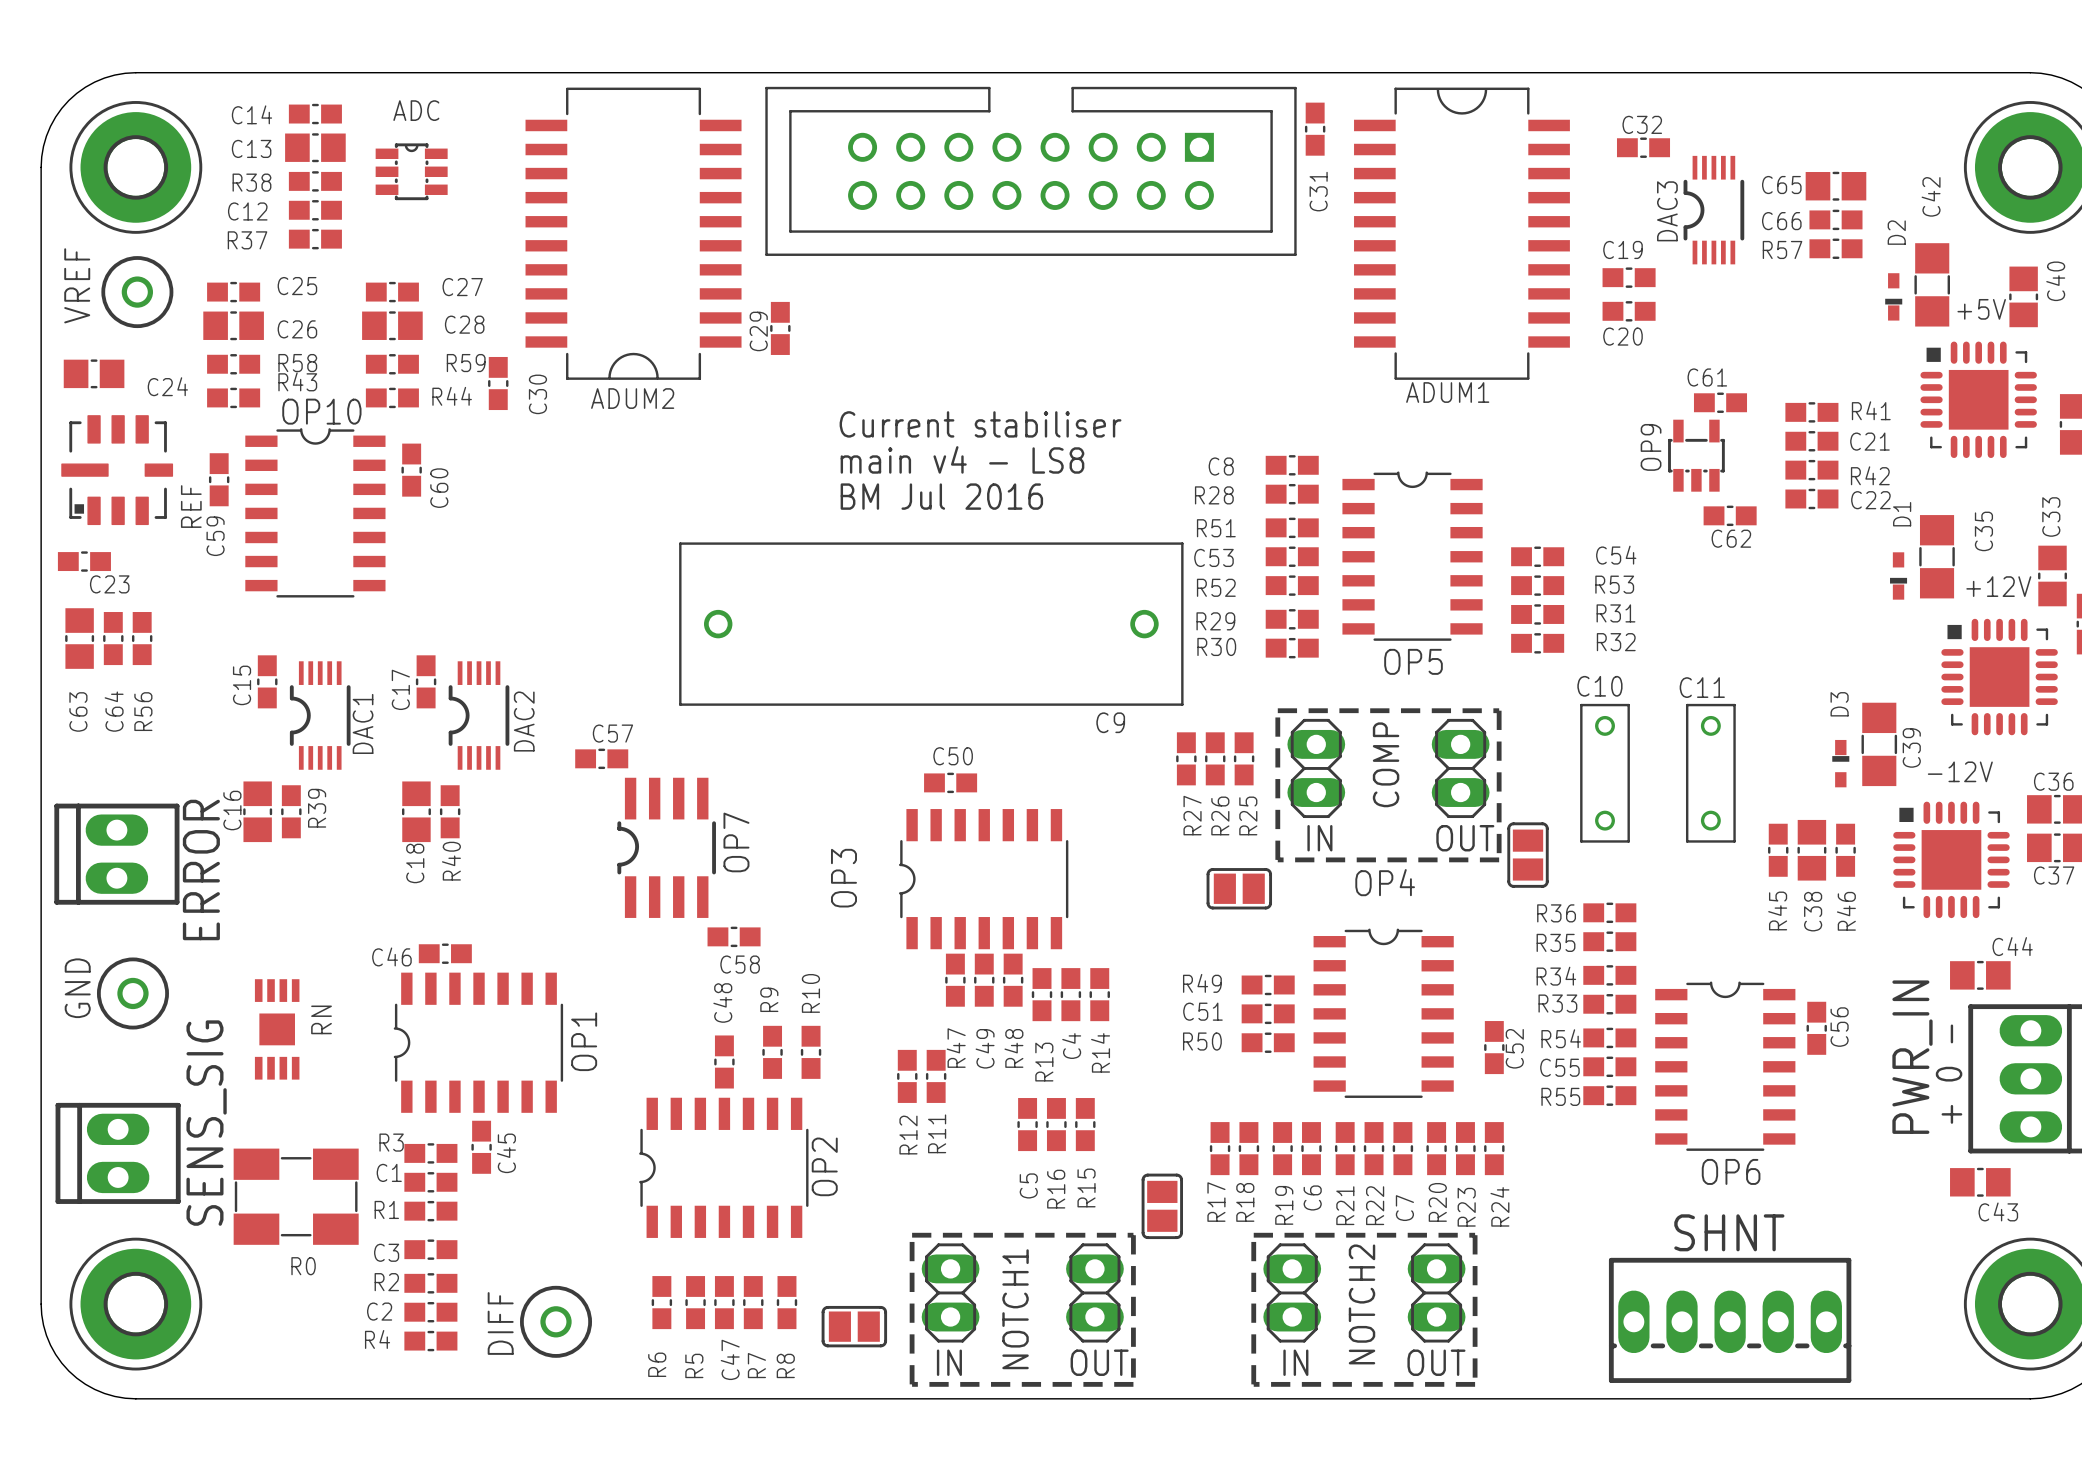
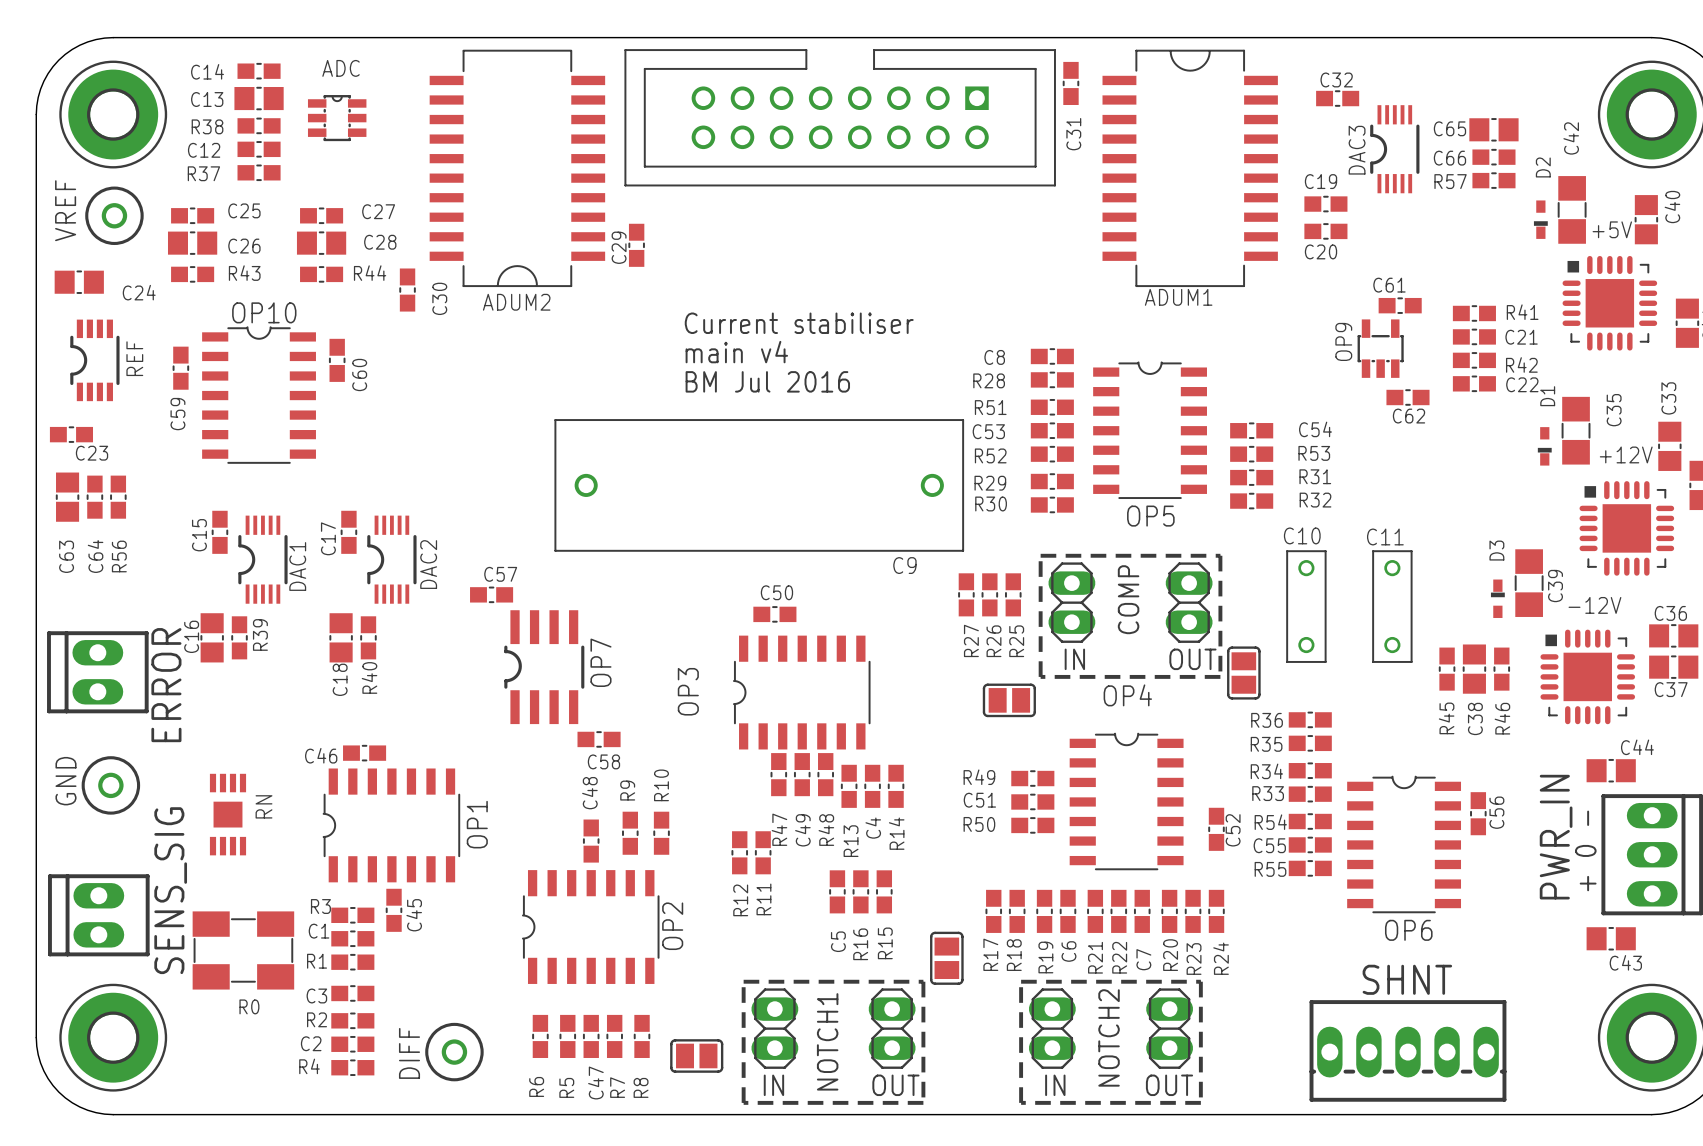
R58 name: R58 (297, 363) -> R43 (244, 273)
R59 name: R59 (466, 363) -> R44 (370, 273)
R43: (233, 397) -> none
R44: (392, 397) -> none
REF footprint: [61, 415, 174, 526] -> [70, 319, 120, 402]
text: main v4 - LS8 (962, 459) -> main v4 (736, 352)
REF name position: REF (191, 506) -> REF (134, 358)

